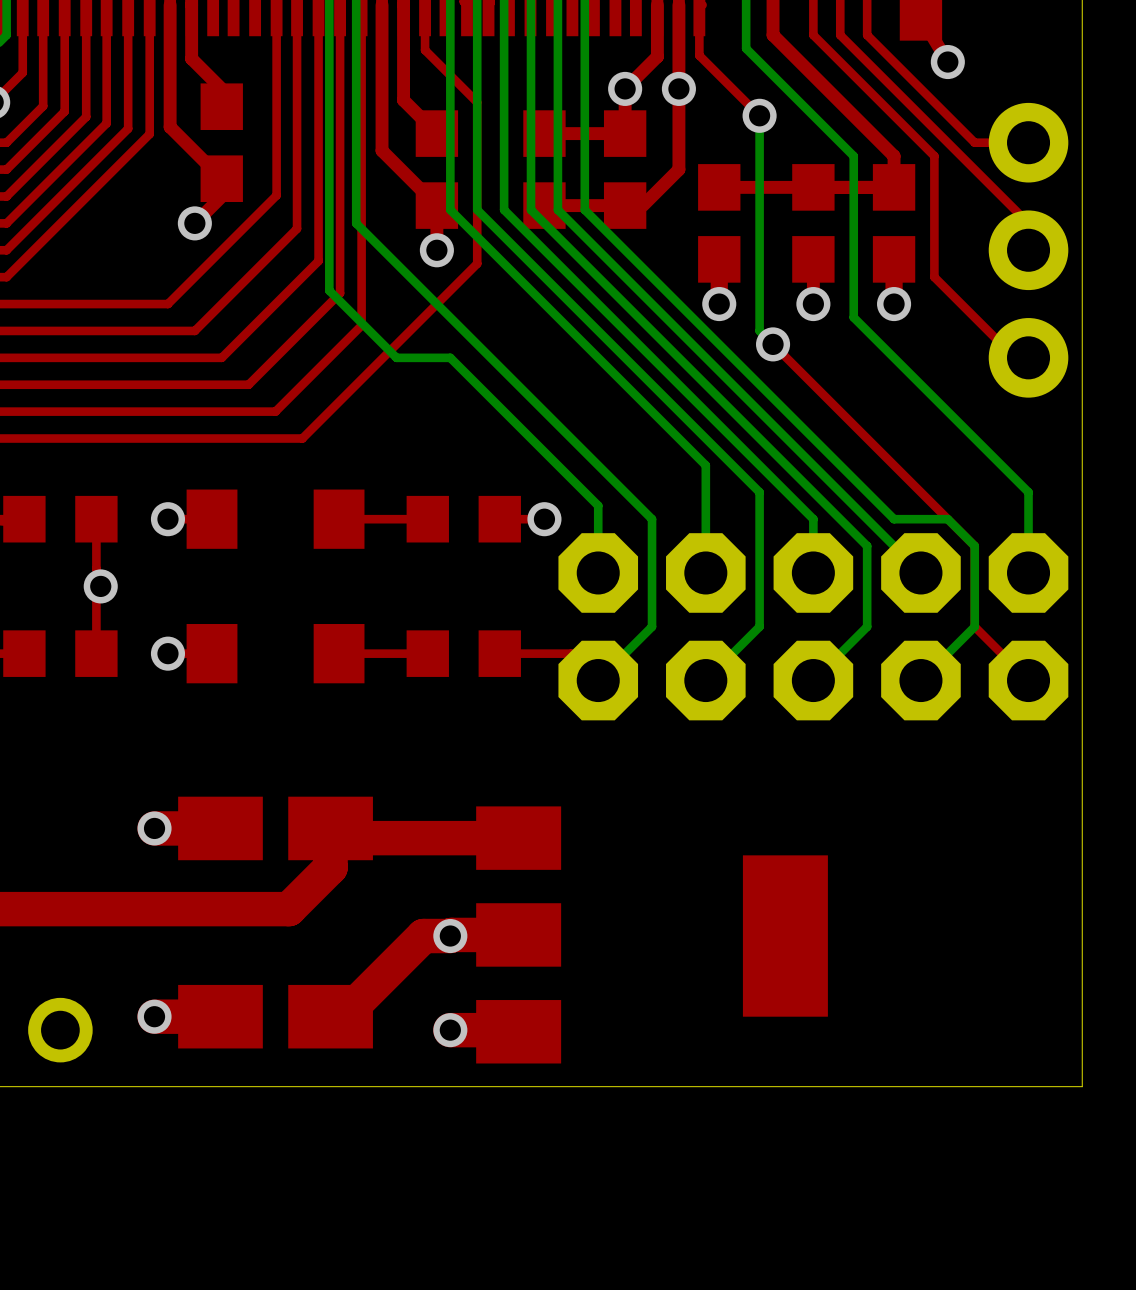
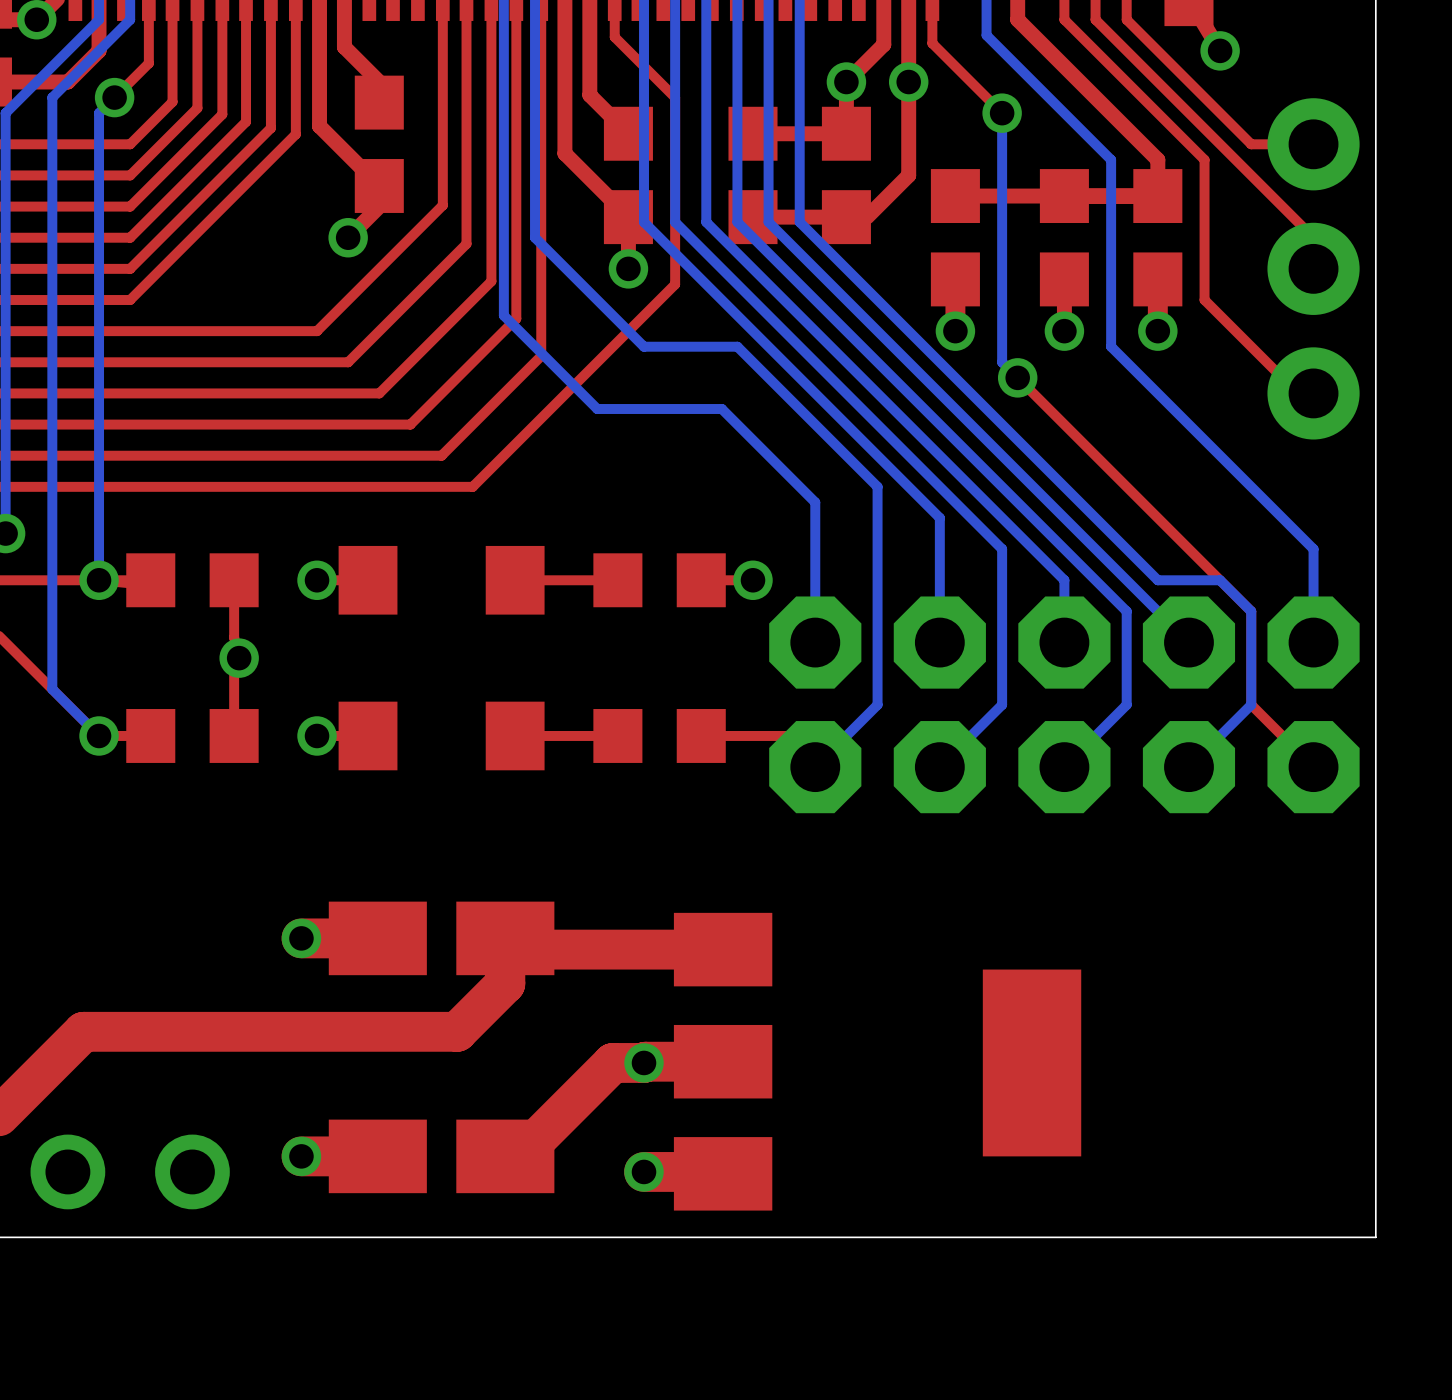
bottom track: (450, 317) (652, 519) -> (644, 346) (737, 346) (877, 486) (877, 580)
bottom track: (396, 357) (450, 357) (598, 505) -> (581, 393) (597, 409) (721, 409) (815, 502) (815, 564)

